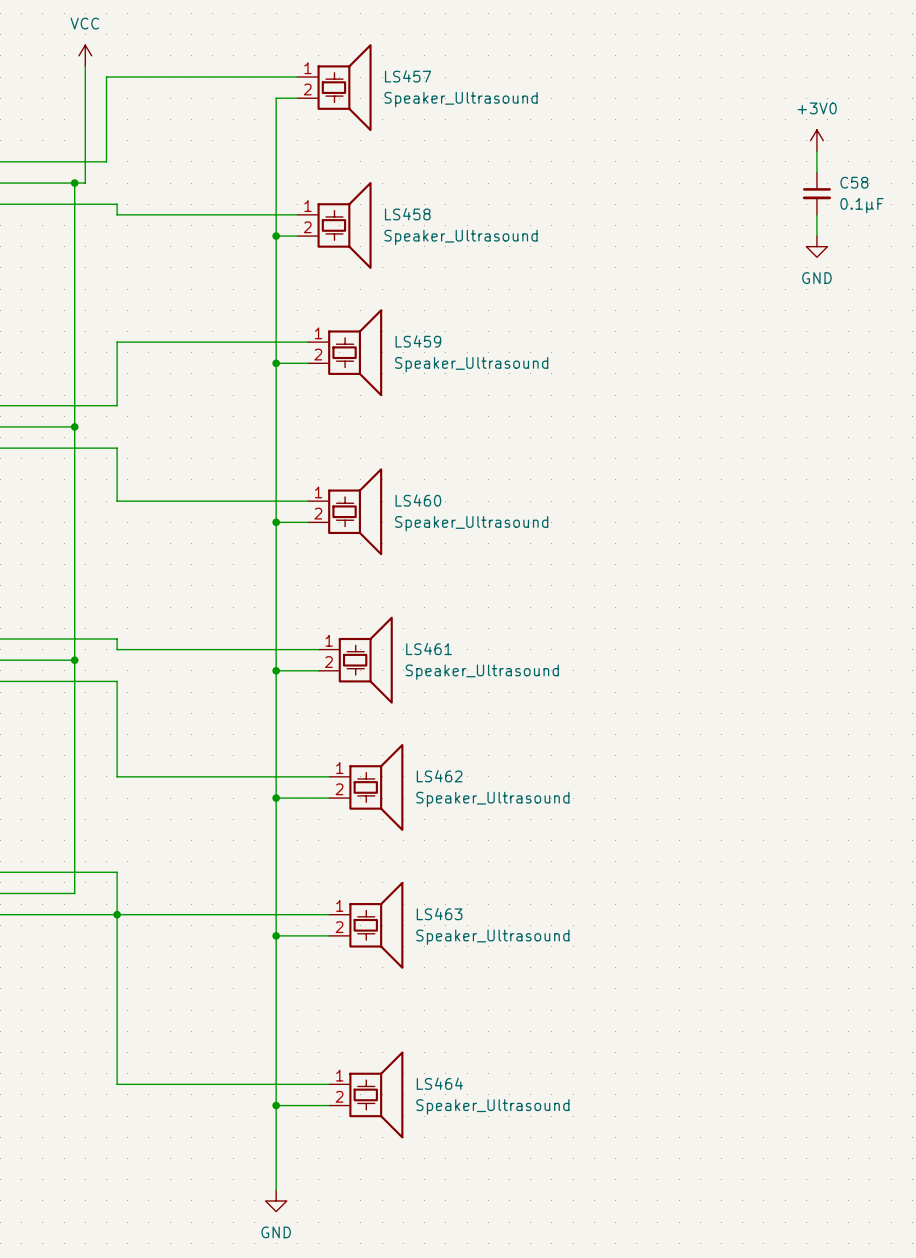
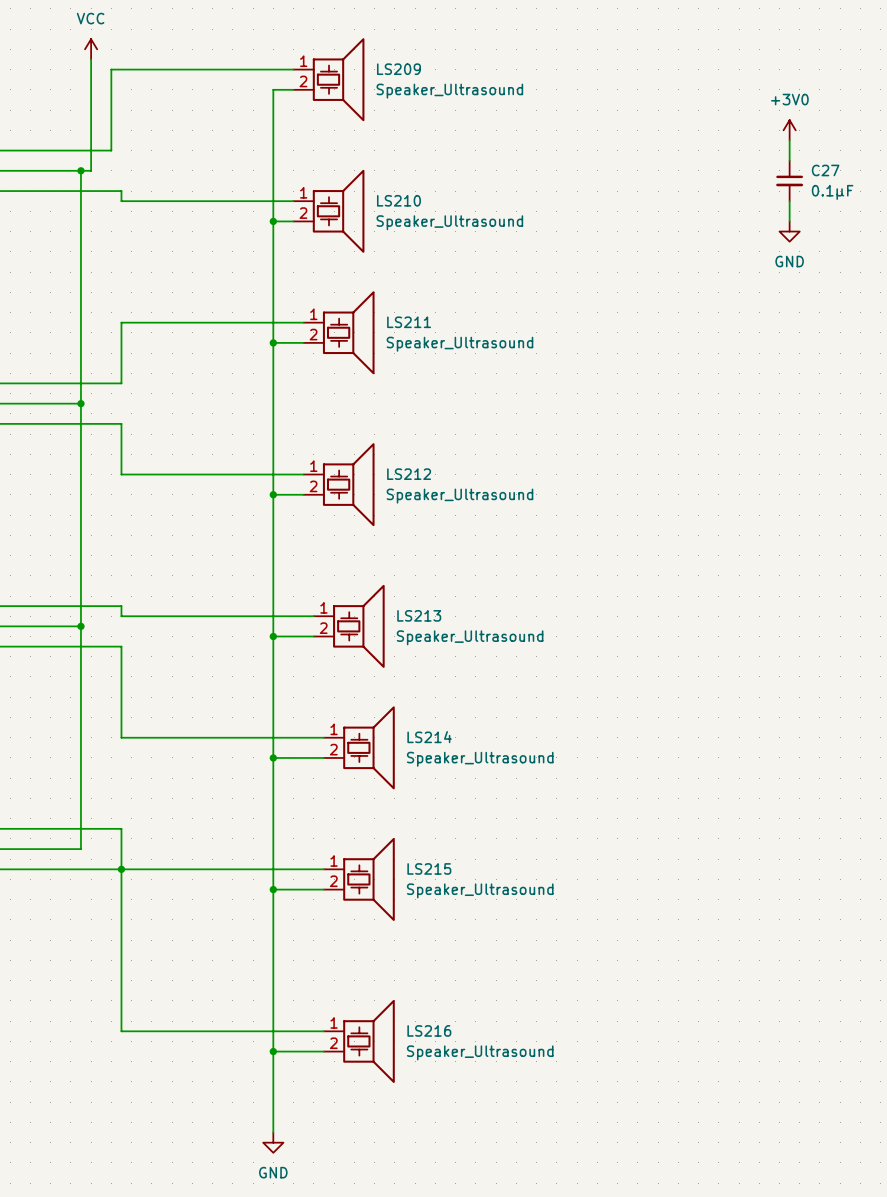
LS457 name: LS457 (408, 76) -> LS209 (398, 69)
C58 name: C58 (854, 182) -> C27 (825, 170)
LS458 name: LS458 (407, 214) -> LS210 (398, 200)
LS459 name: LS459 (418, 341) -> LS211 (409, 322)
LS460 name: LS460 (418, 500) -> LS212 (409, 474)
LS461 name: LS461 (428, 648) -> LS213 (419, 615)
LS462 name: LS462 (439, 776) -> LS214 (429, 737)
LS463 name: LS463 (439, 914) -> LS215 (429, 868)
LS464 name: LS464 (439, 1083) -> LS216 (429, 1030)

